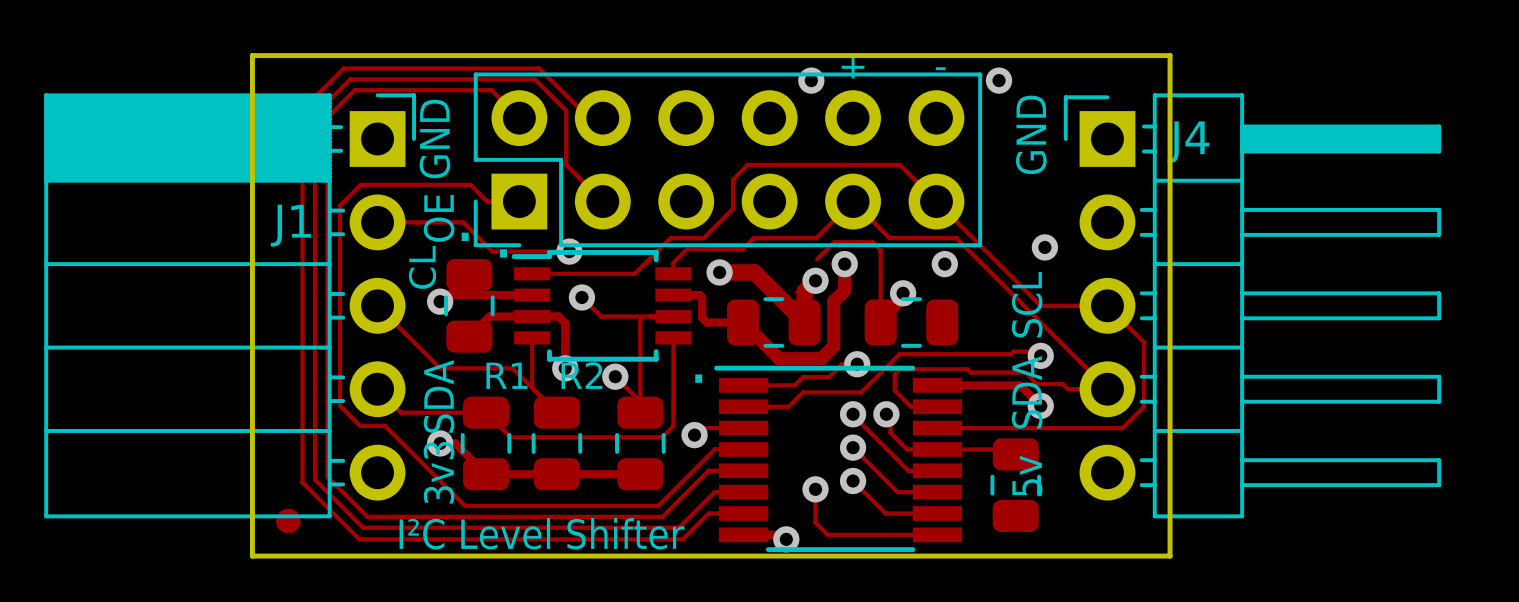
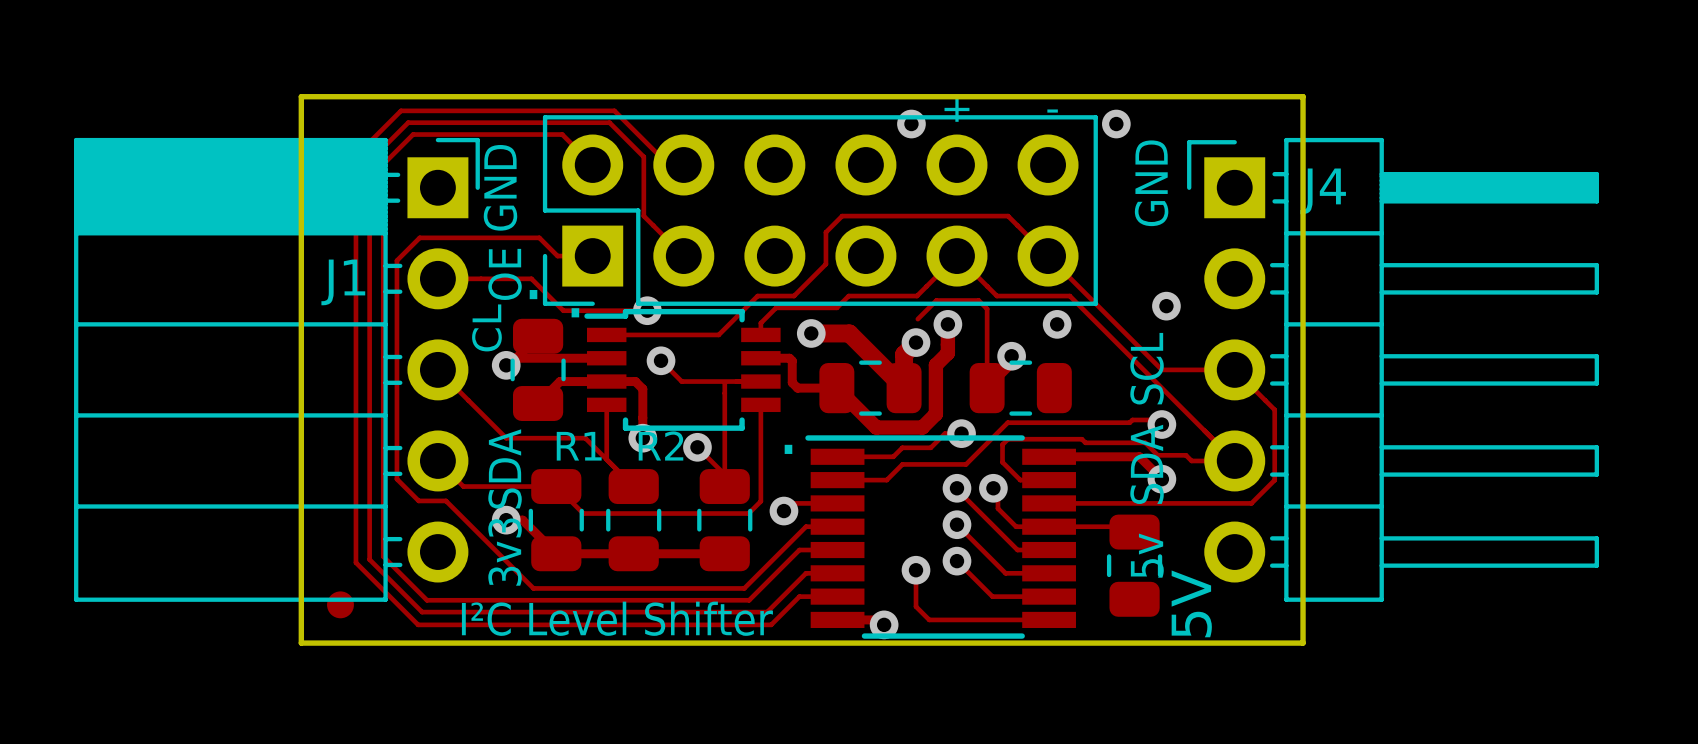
text: none -> 5V (1191, 603)

